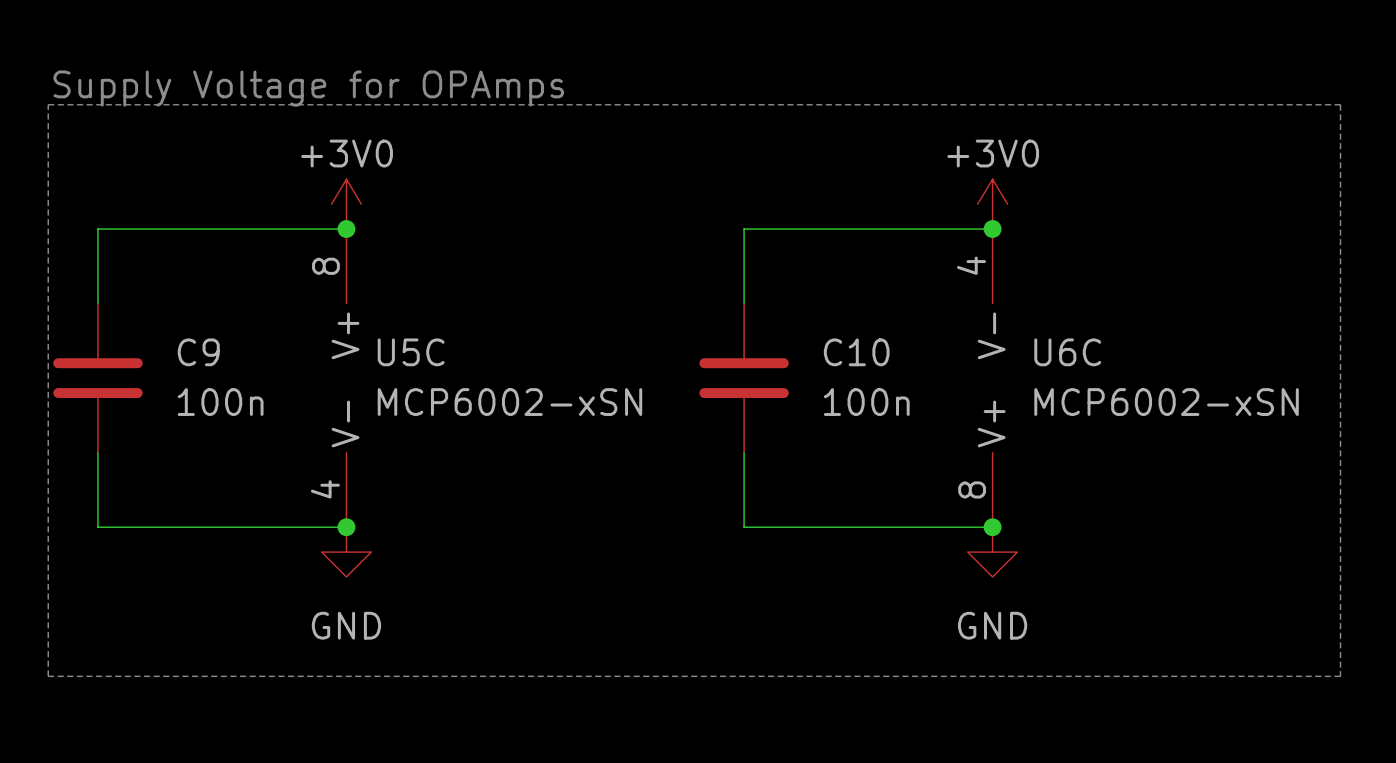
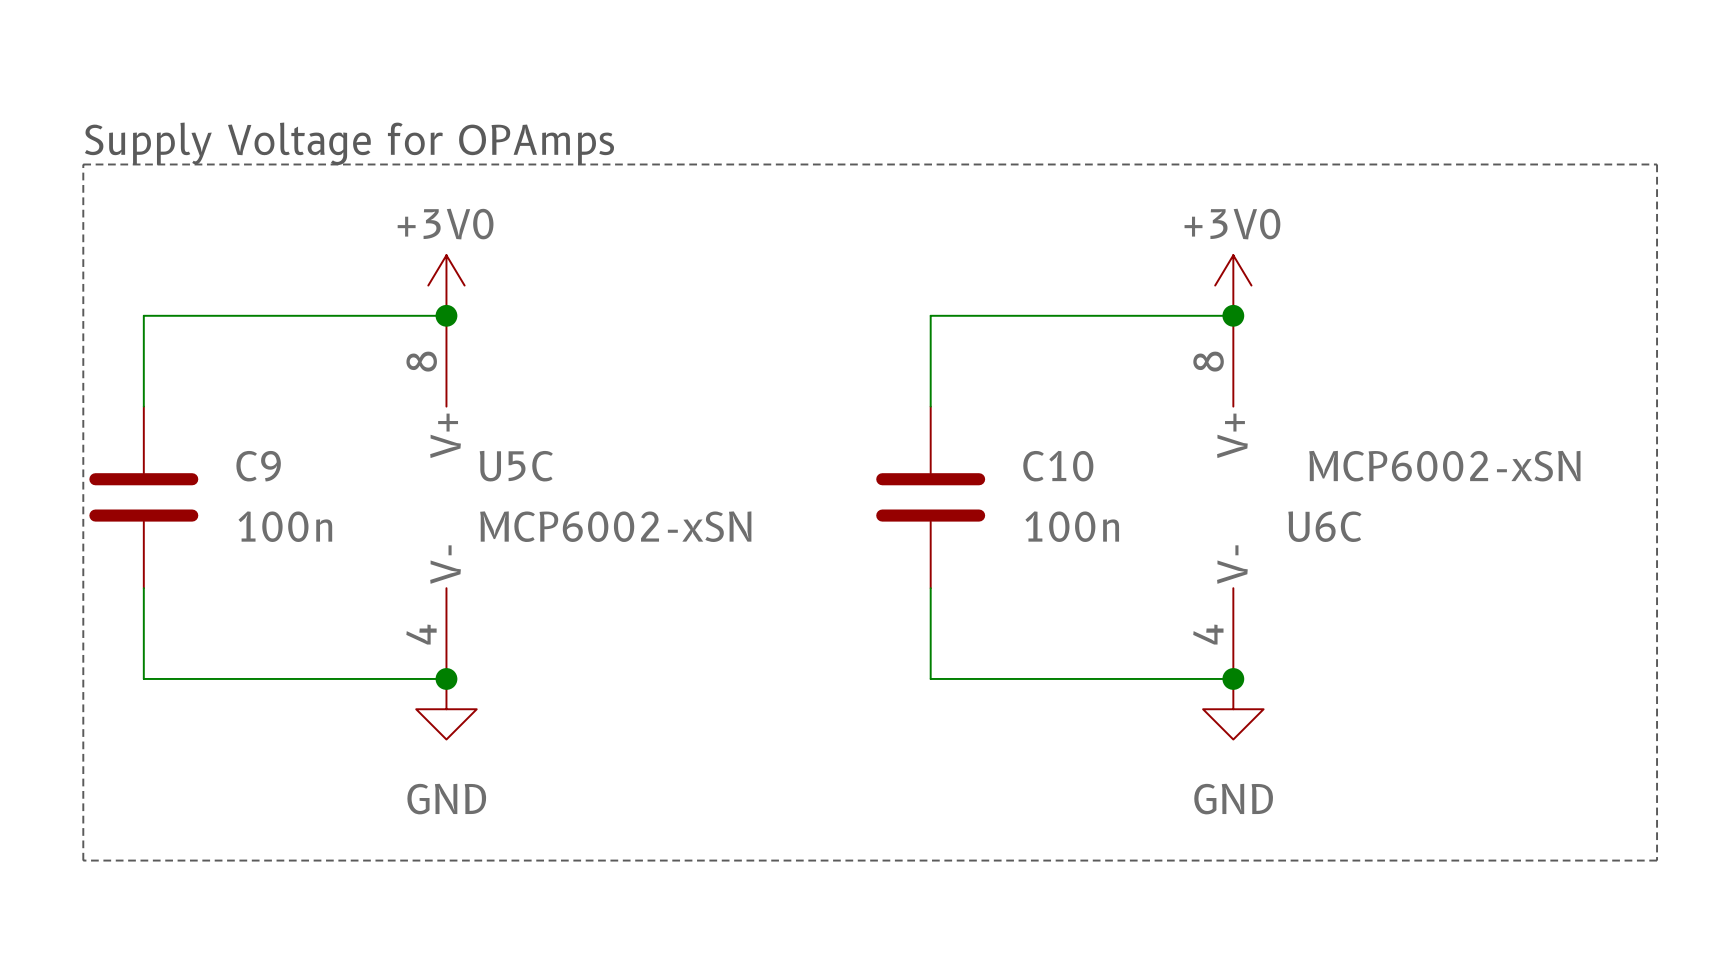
U6C name position: U6C (1067, 352) -> U6C (1324, 526)
U6C rotation: 0° (992, 378) -> 180° (1233, 497)
U6C value position: MCP6002-xSN (1166, 402) -> MCP6002-xSN (1444, 466)

